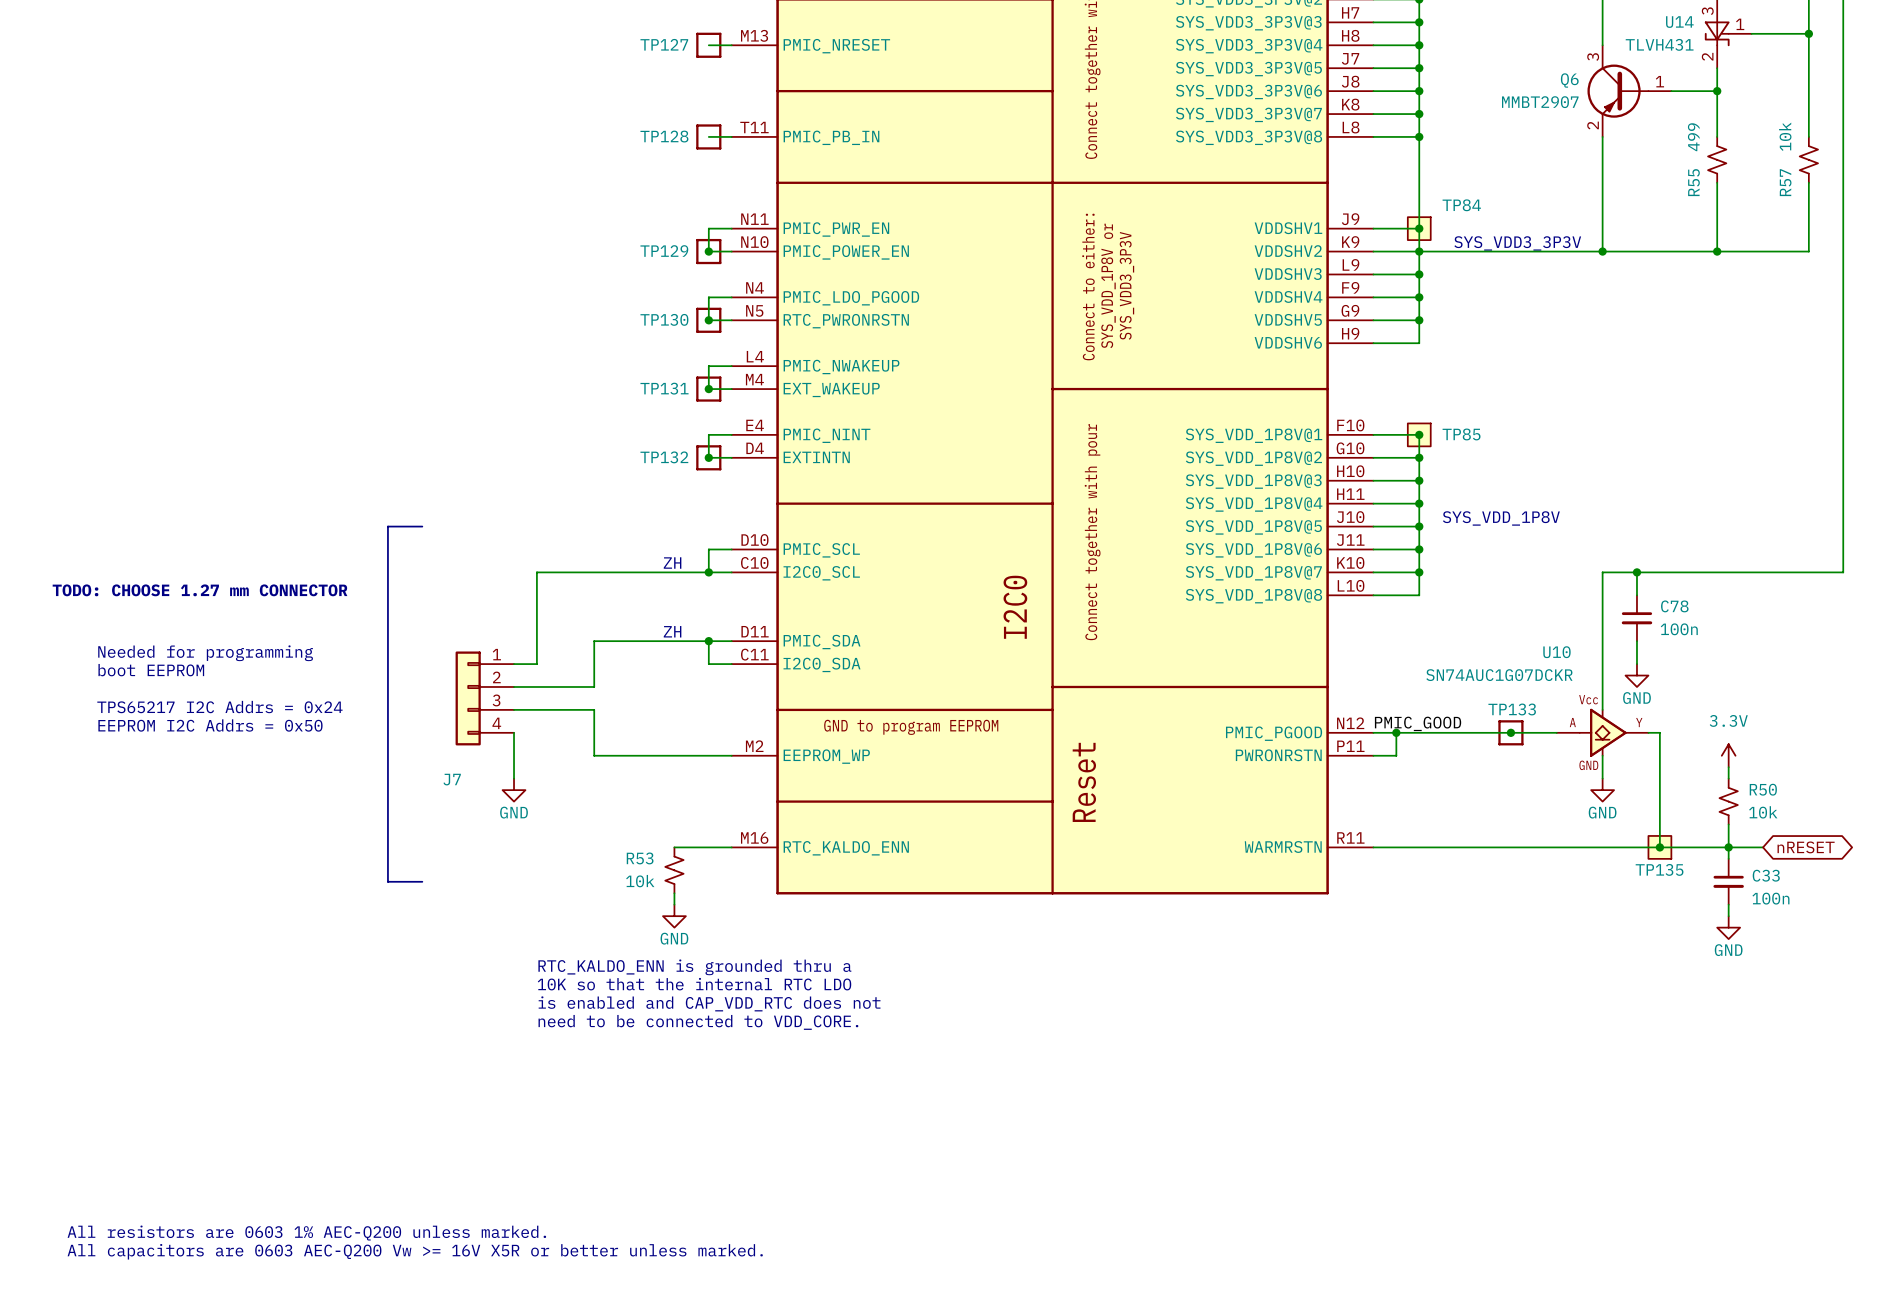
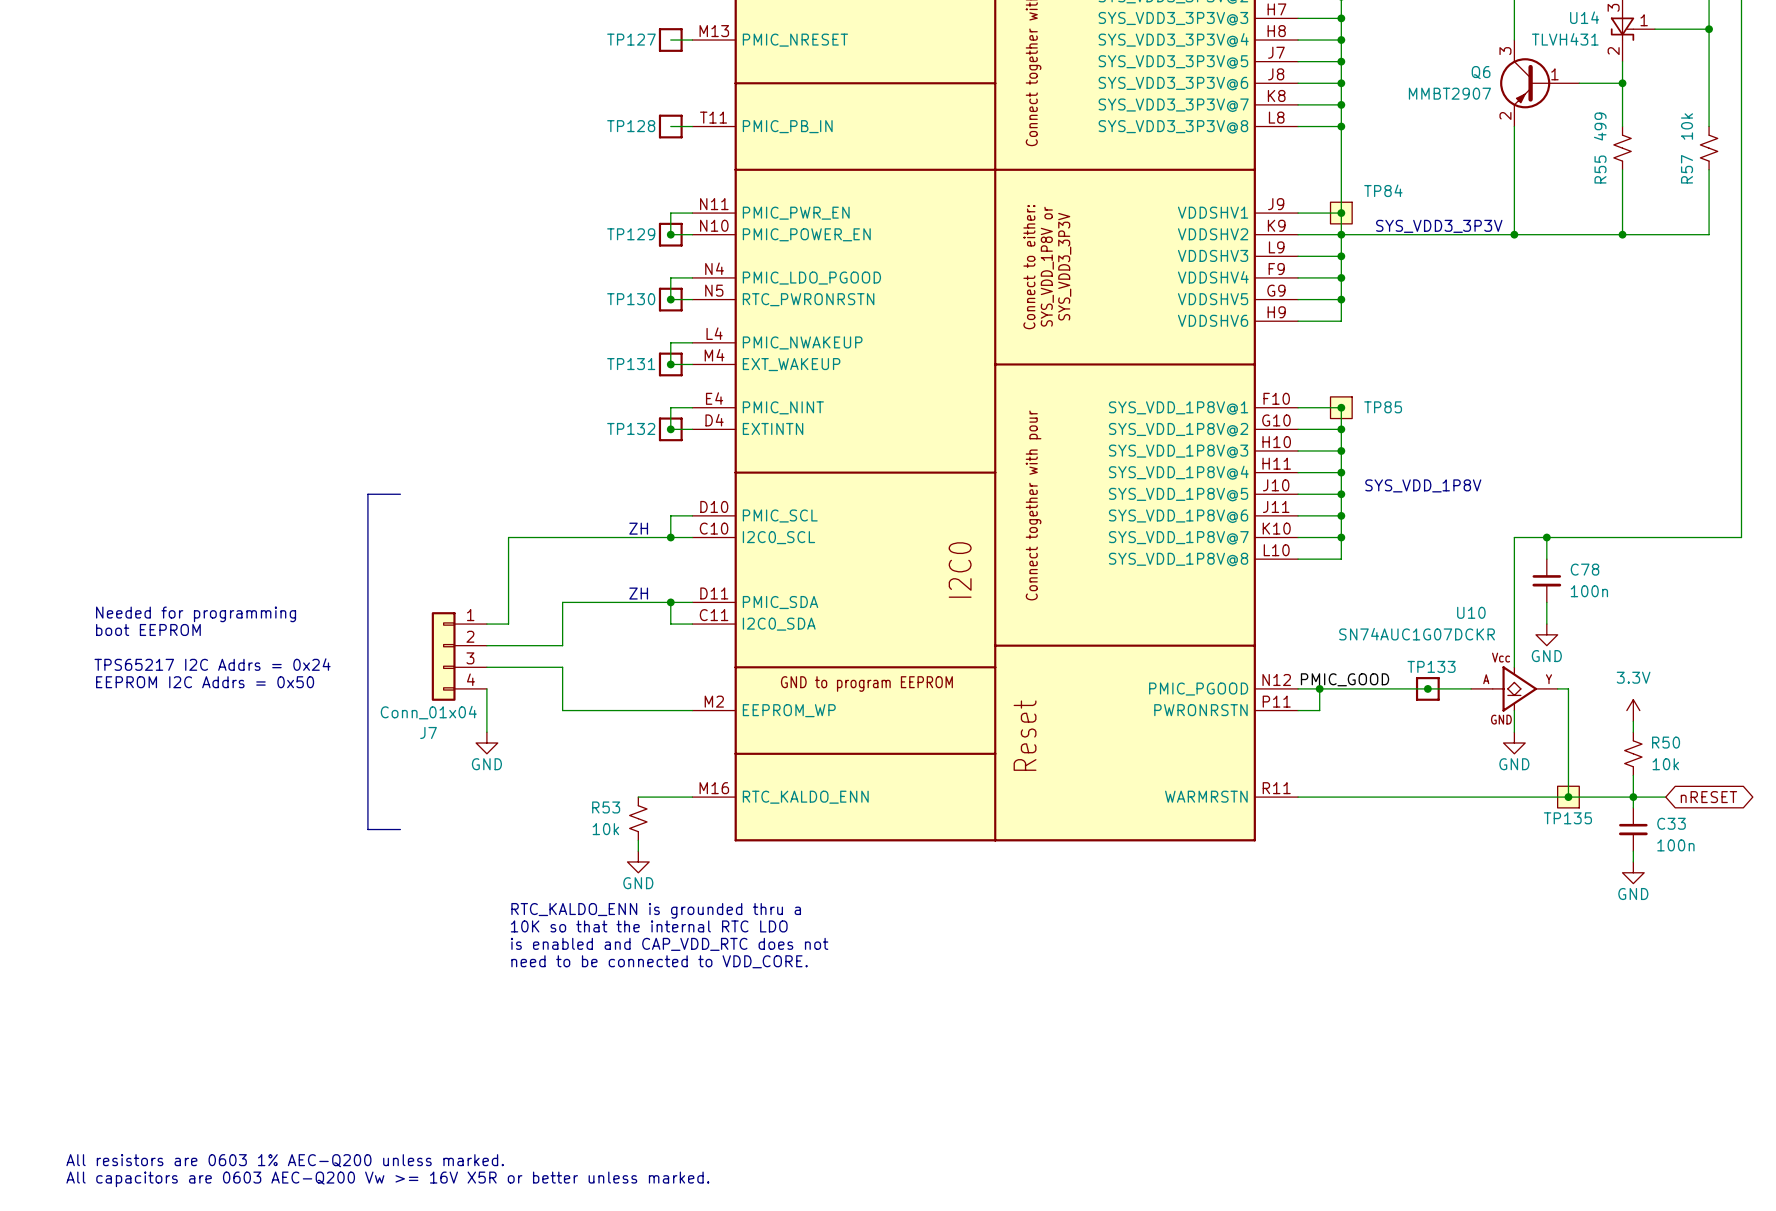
Q6 symbol: [1587, 45, 1672, 137] -> [1500, 40, 1580, 127]
text: TODO: CHOOSE 1.27 mm CONNECTOR (200, 590) -> none
U10 symbol: [1556, 708, 1649, 757] -> [1471, 666, 1558, 712]
J7 value: none -> Conn_01x04 (428, 712)

